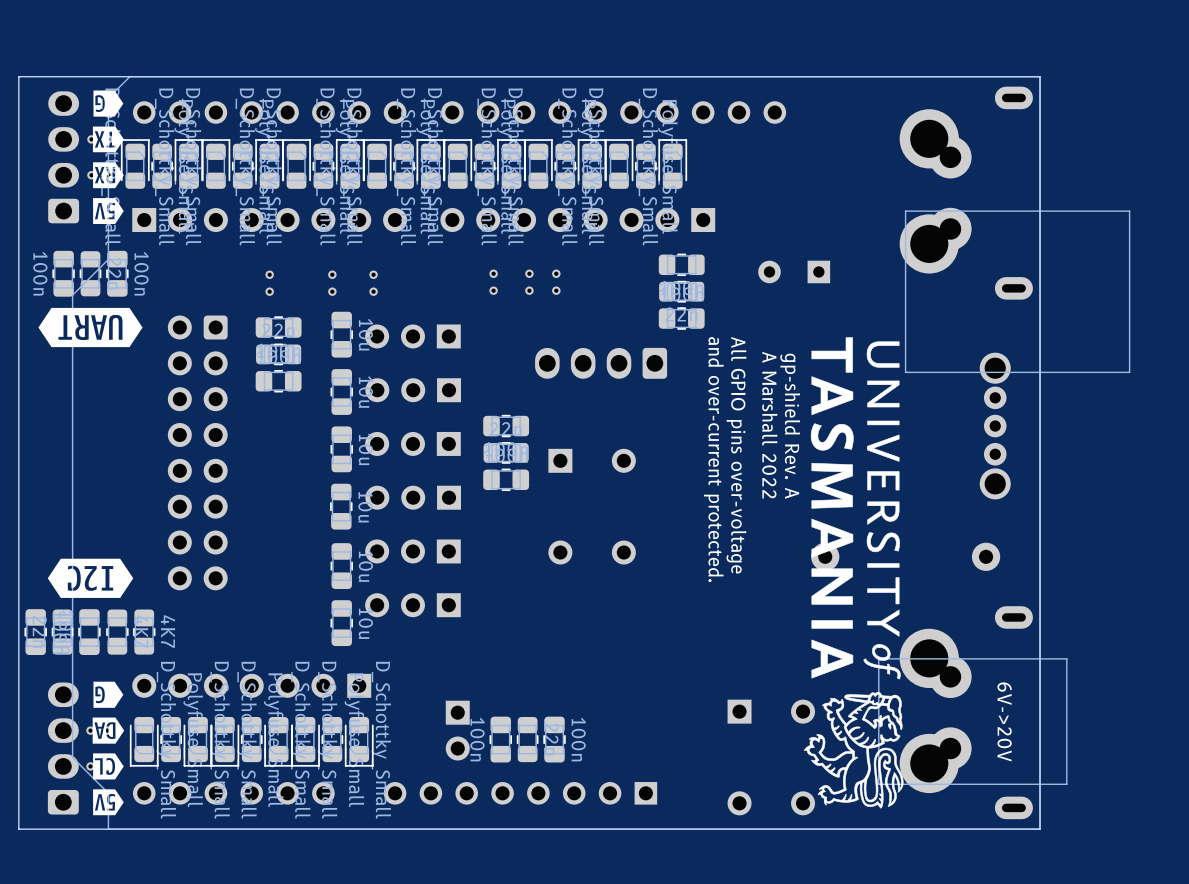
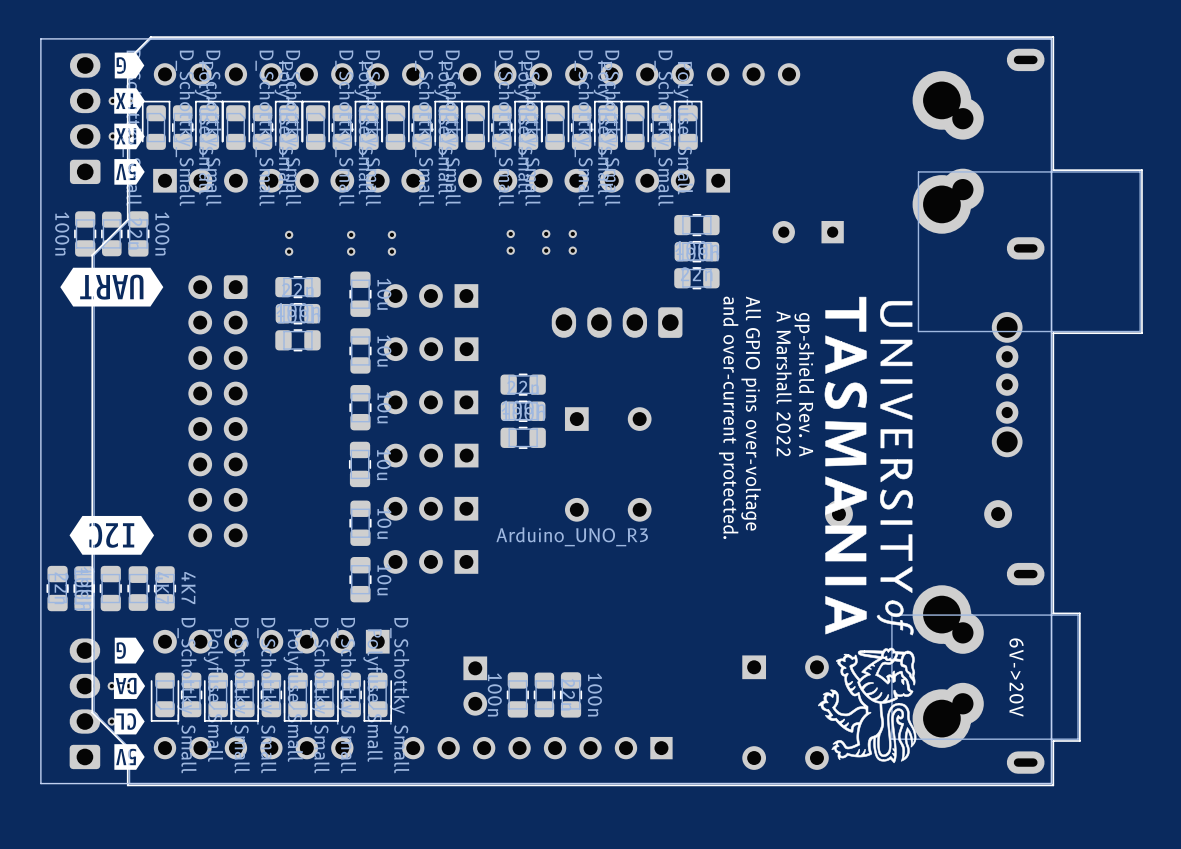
part footprint: [71, 75, 1131, 830] -> [91, 36, 1143, 787]
part value: none -> Arduino_UNO_R3 (572, 536)

